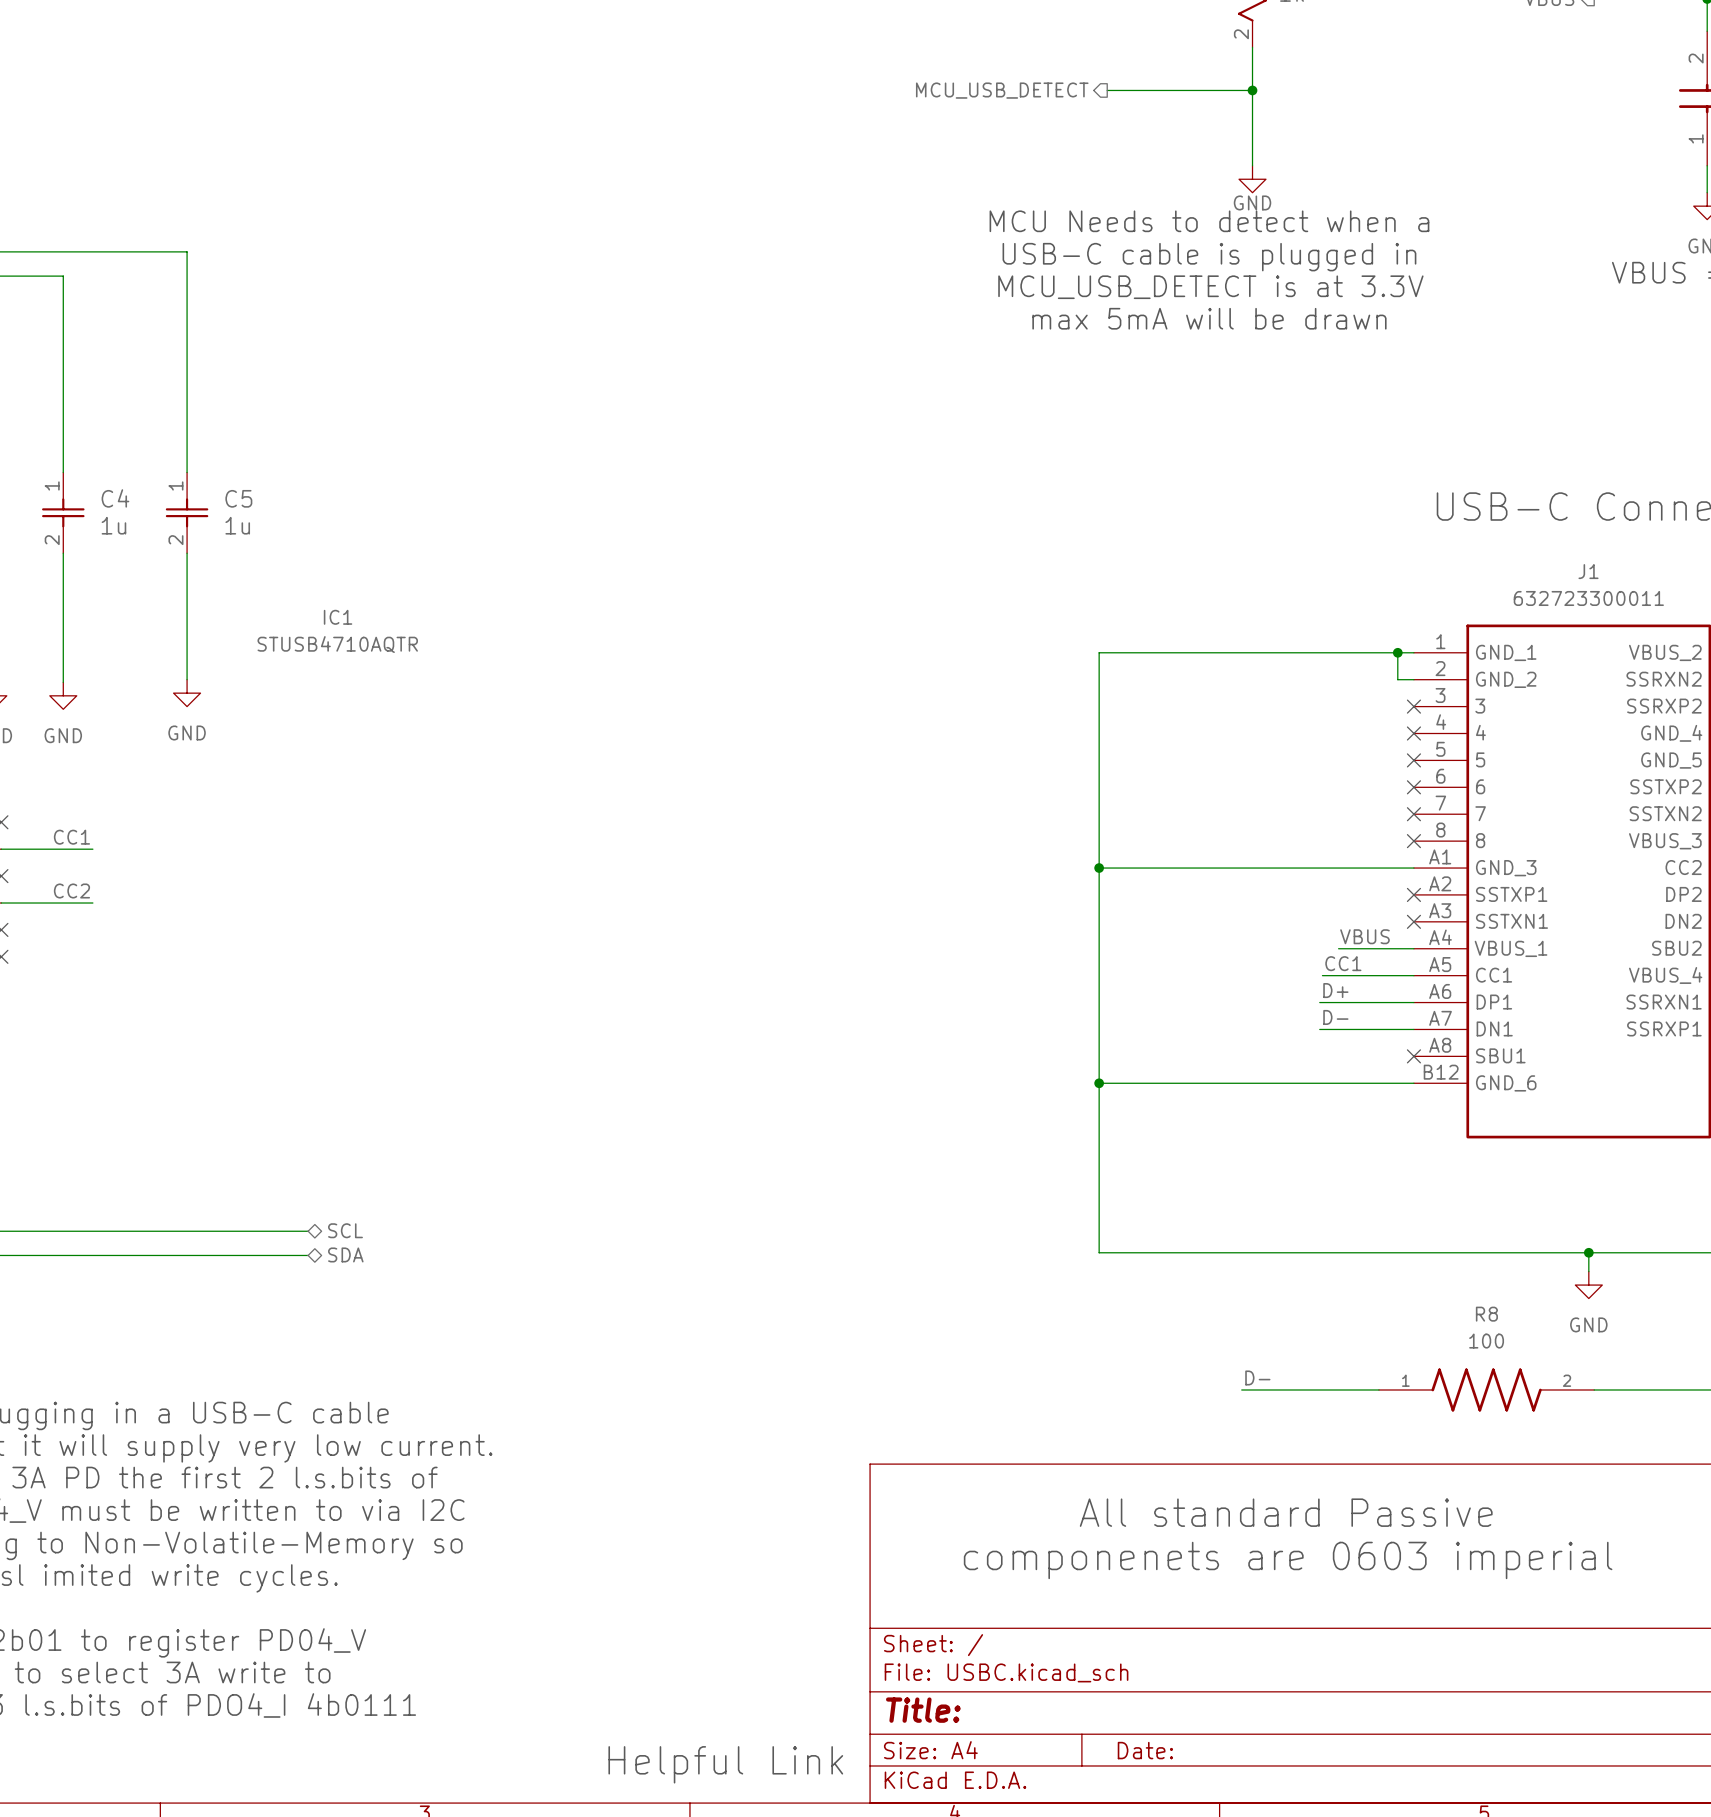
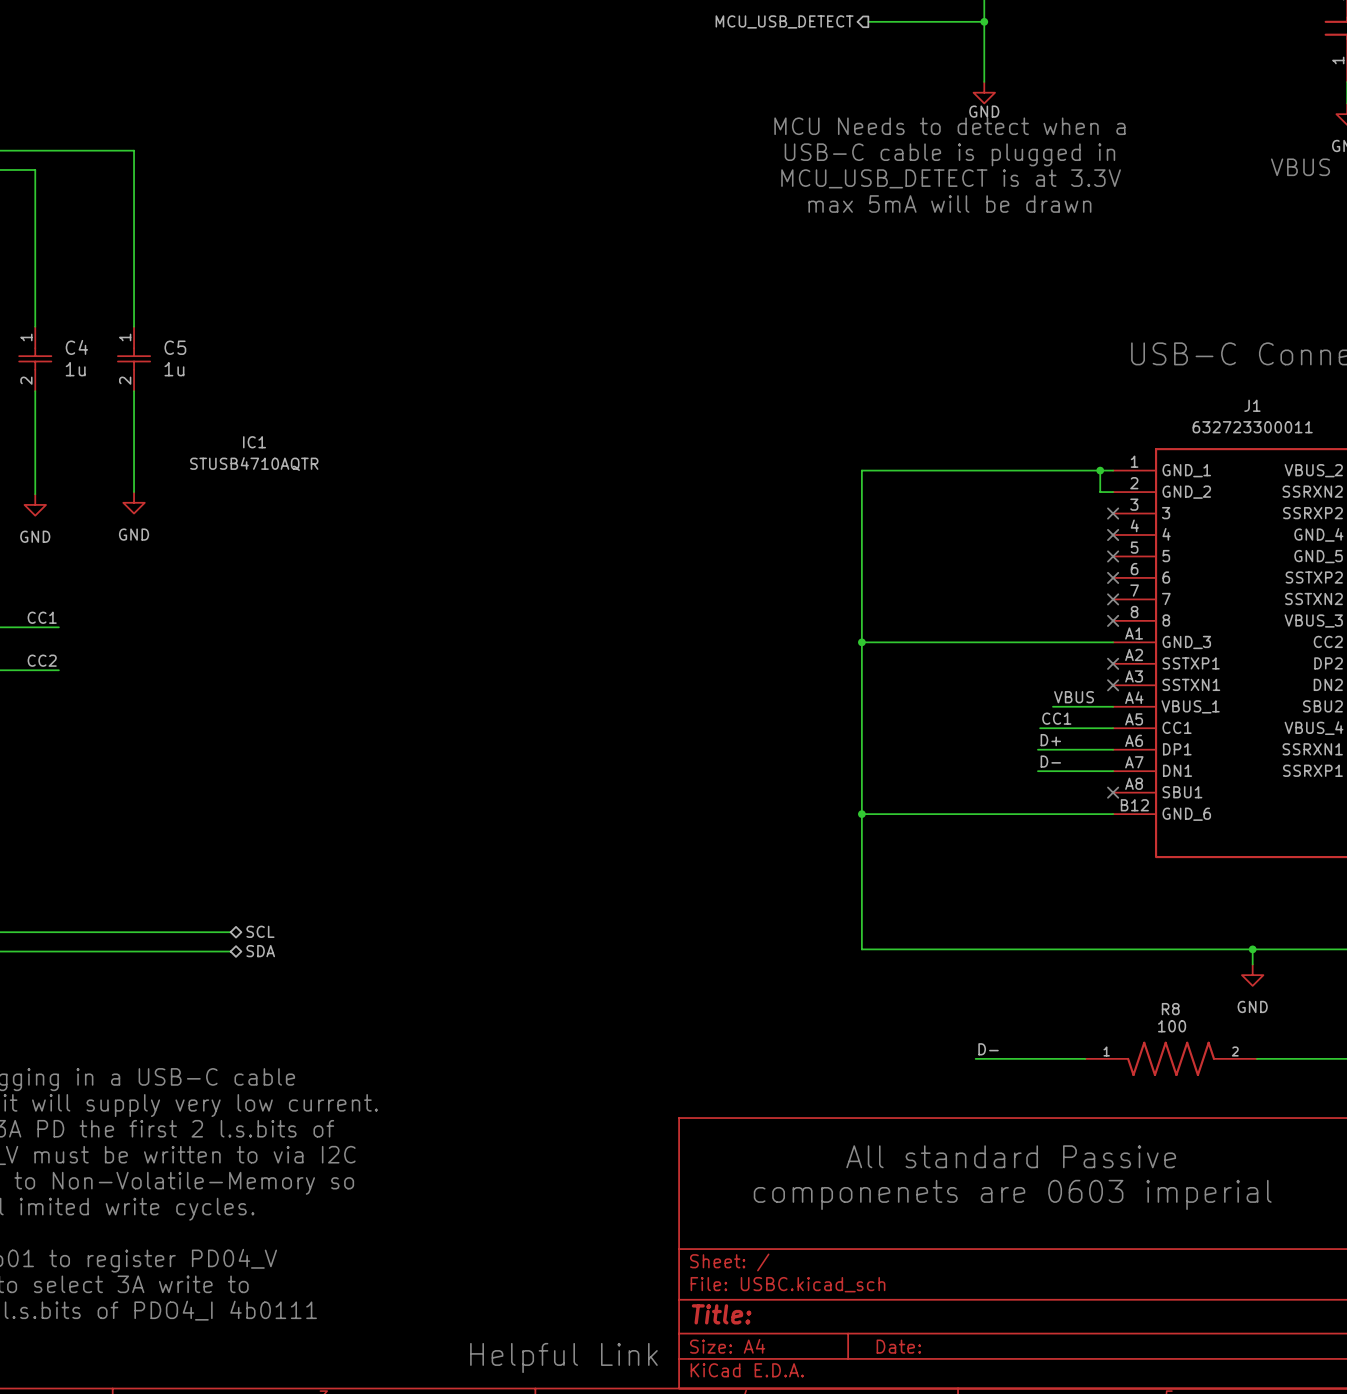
R8 flip: as is (1486, 1389) -> up-down (1171, 1058)

